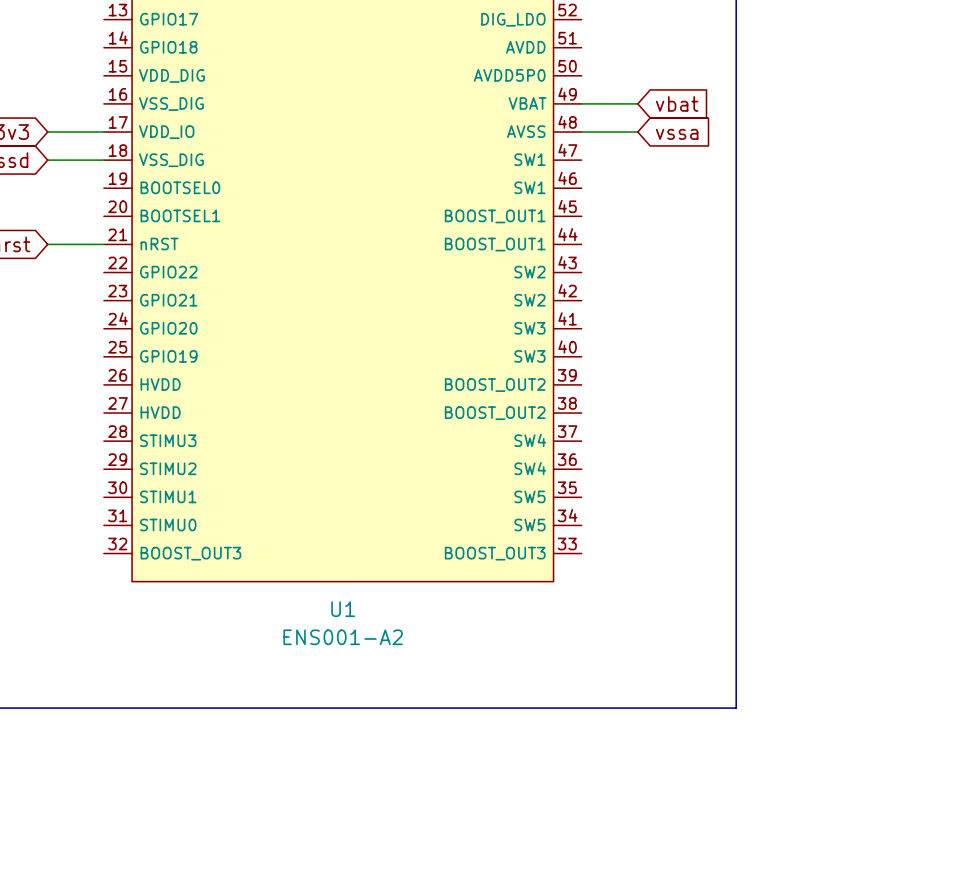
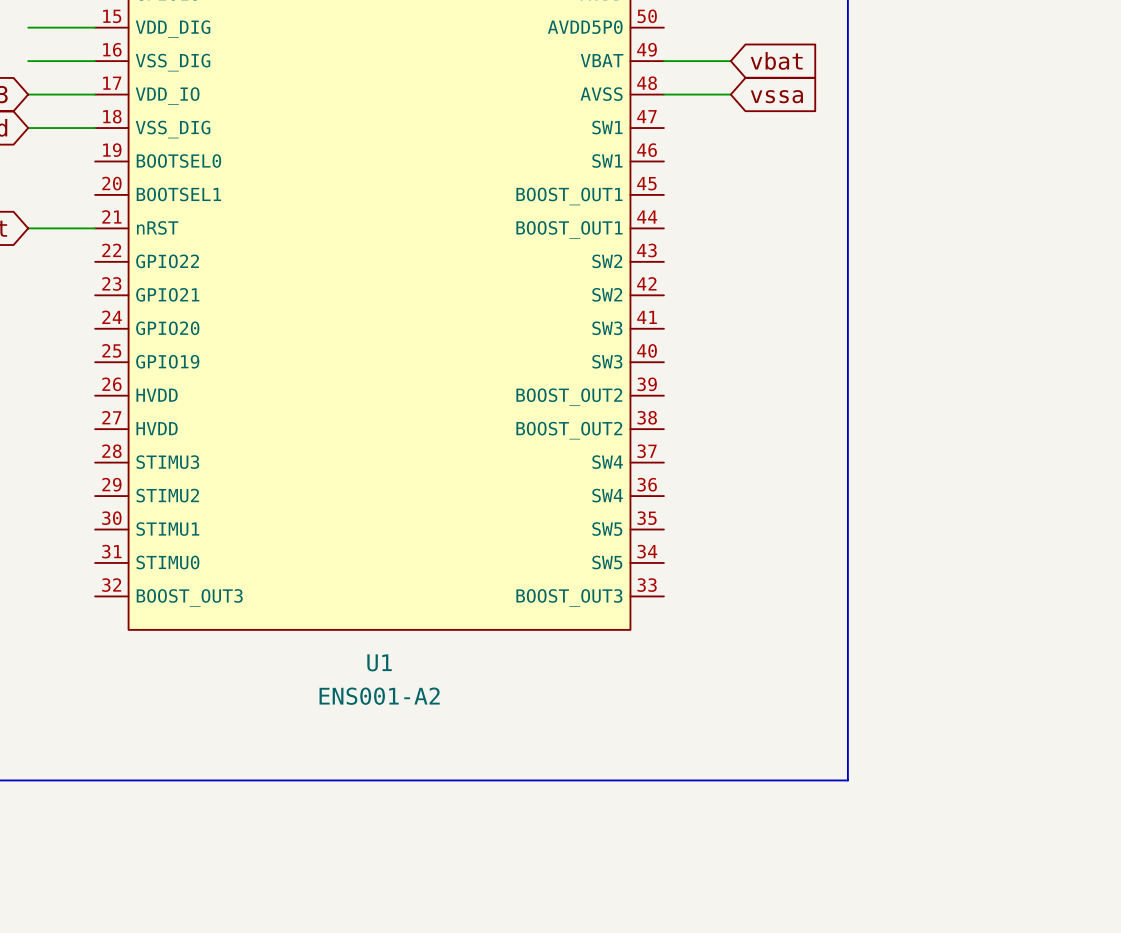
wire: none -> (28, 27) (95, 27)
wire: none -> (28, 61) (95, 61)

